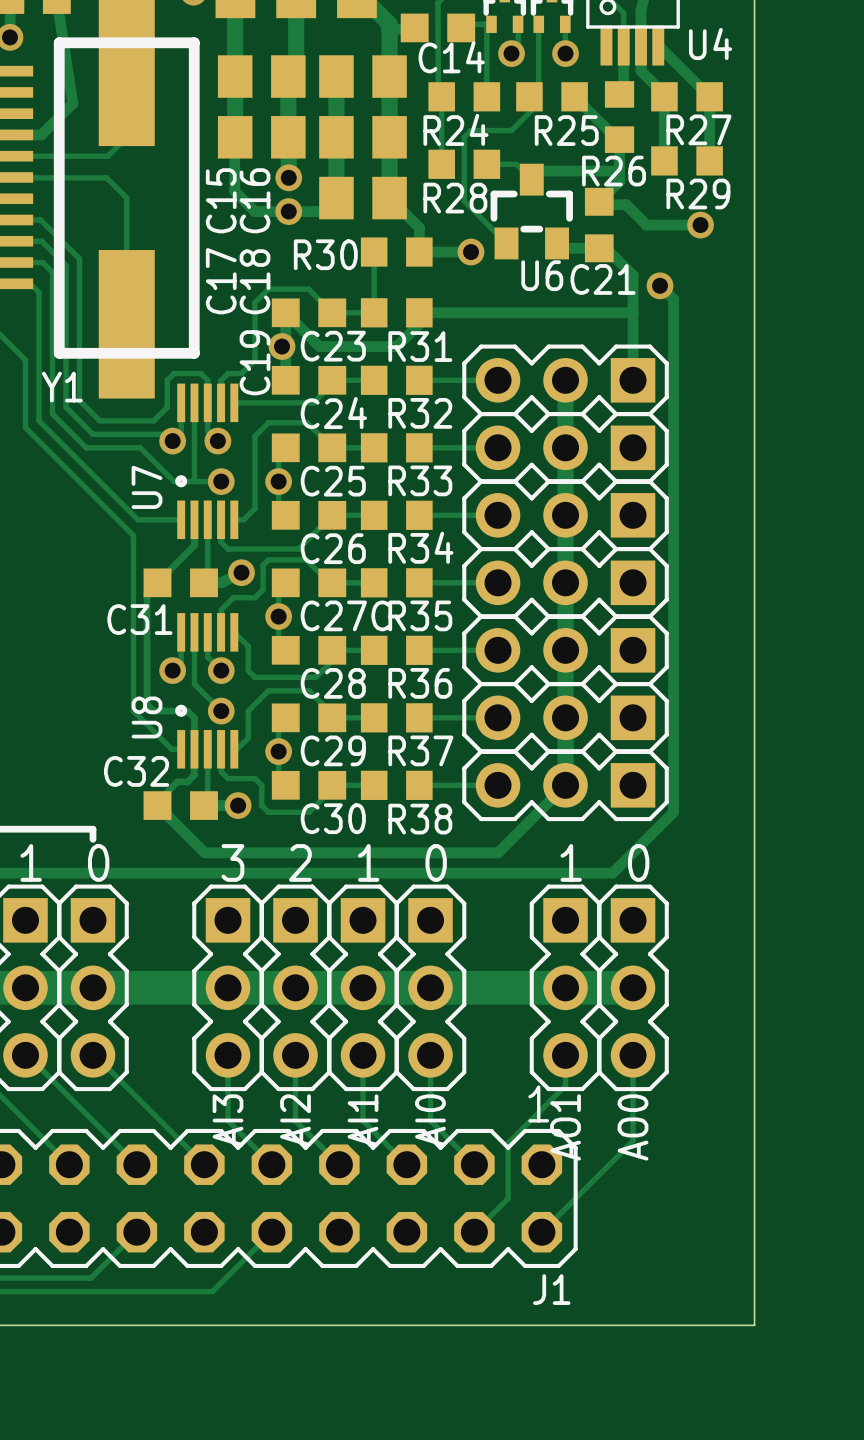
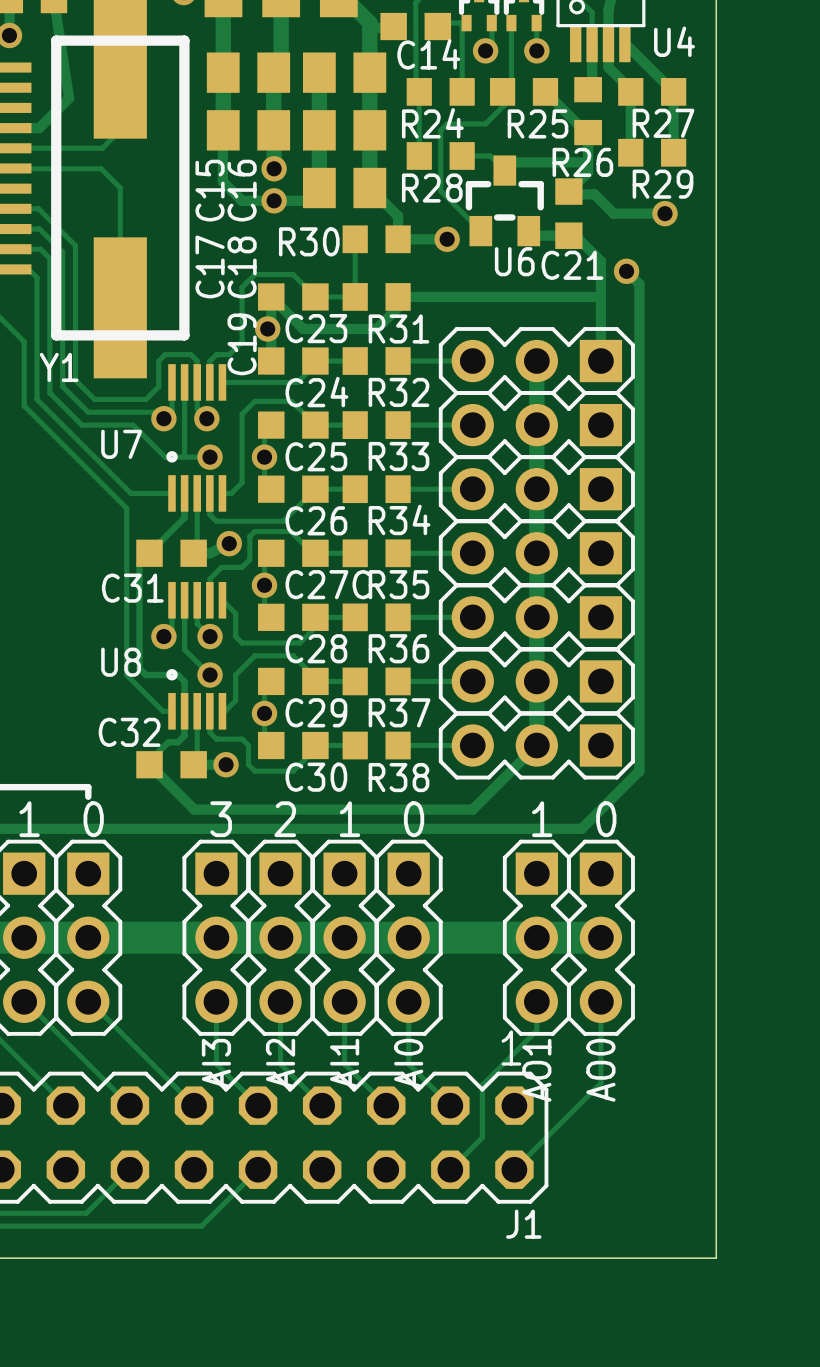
U7 name rotation: 0° (147, 487) -> 90° clockwise (121, 444)
U8 name rotation: 0° (147, 717) -> 90° clockwise (121, 662)

